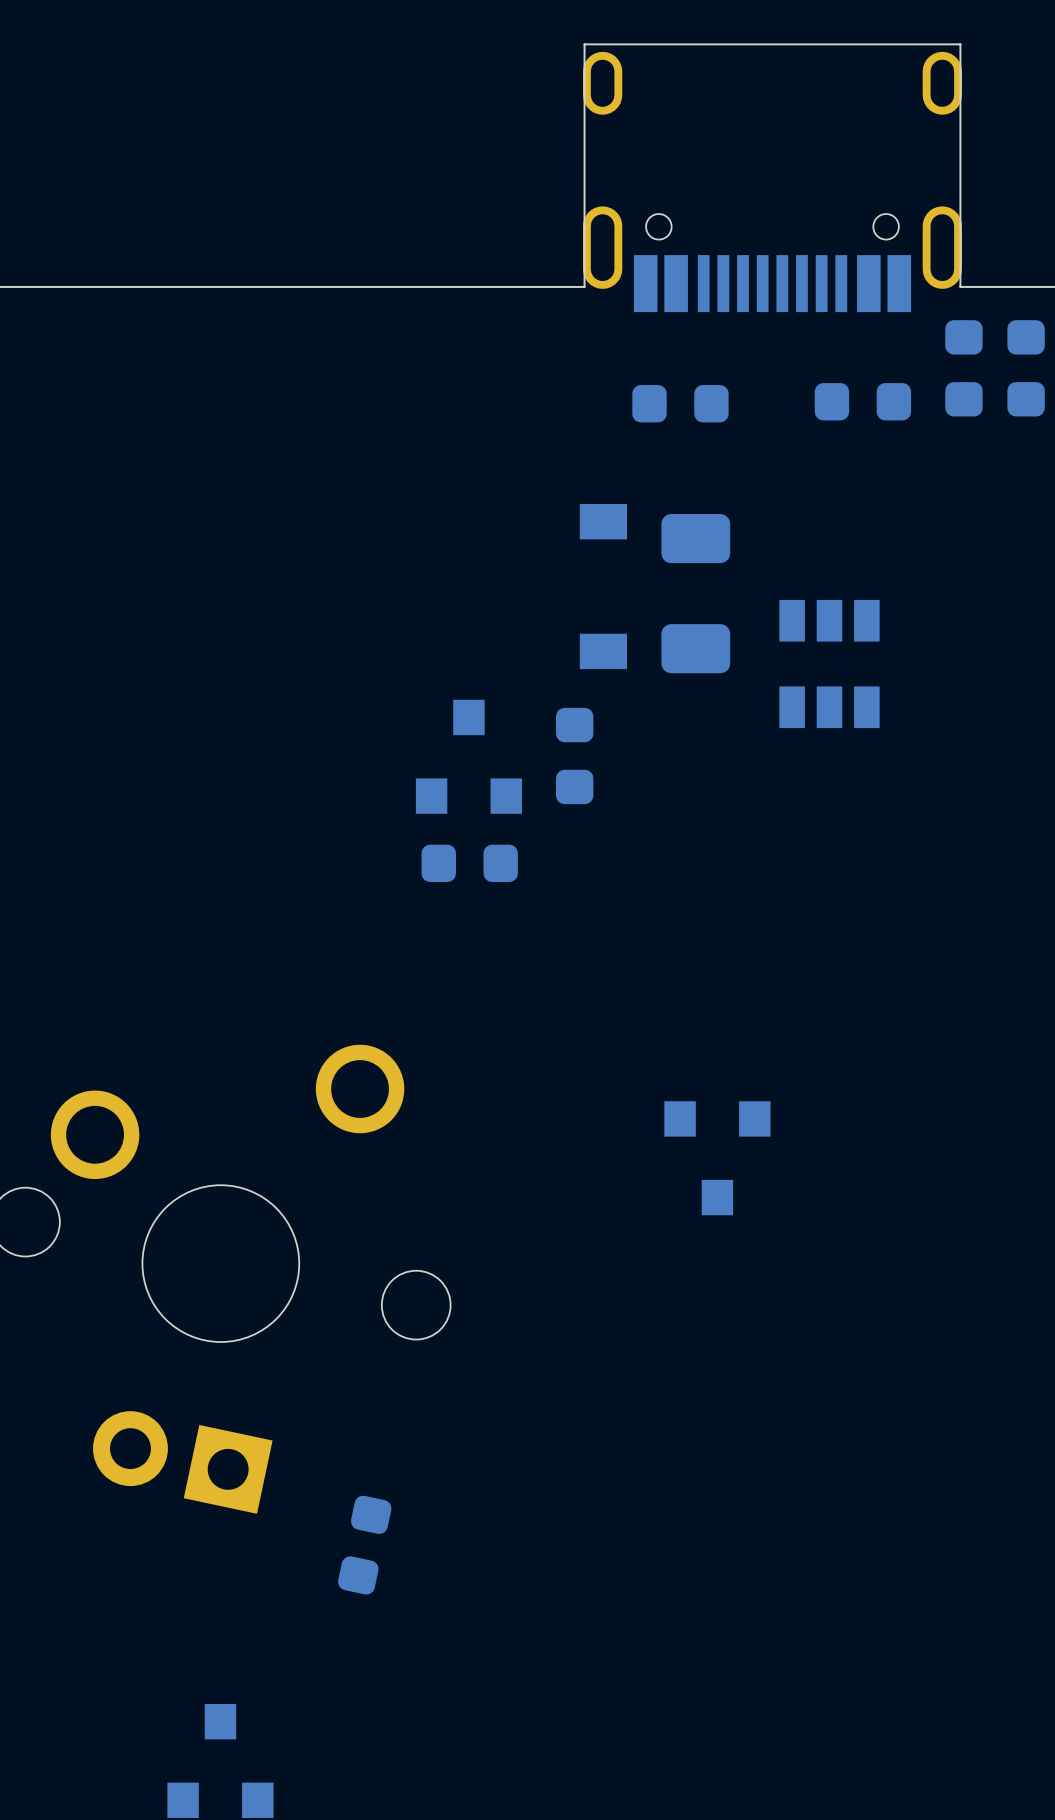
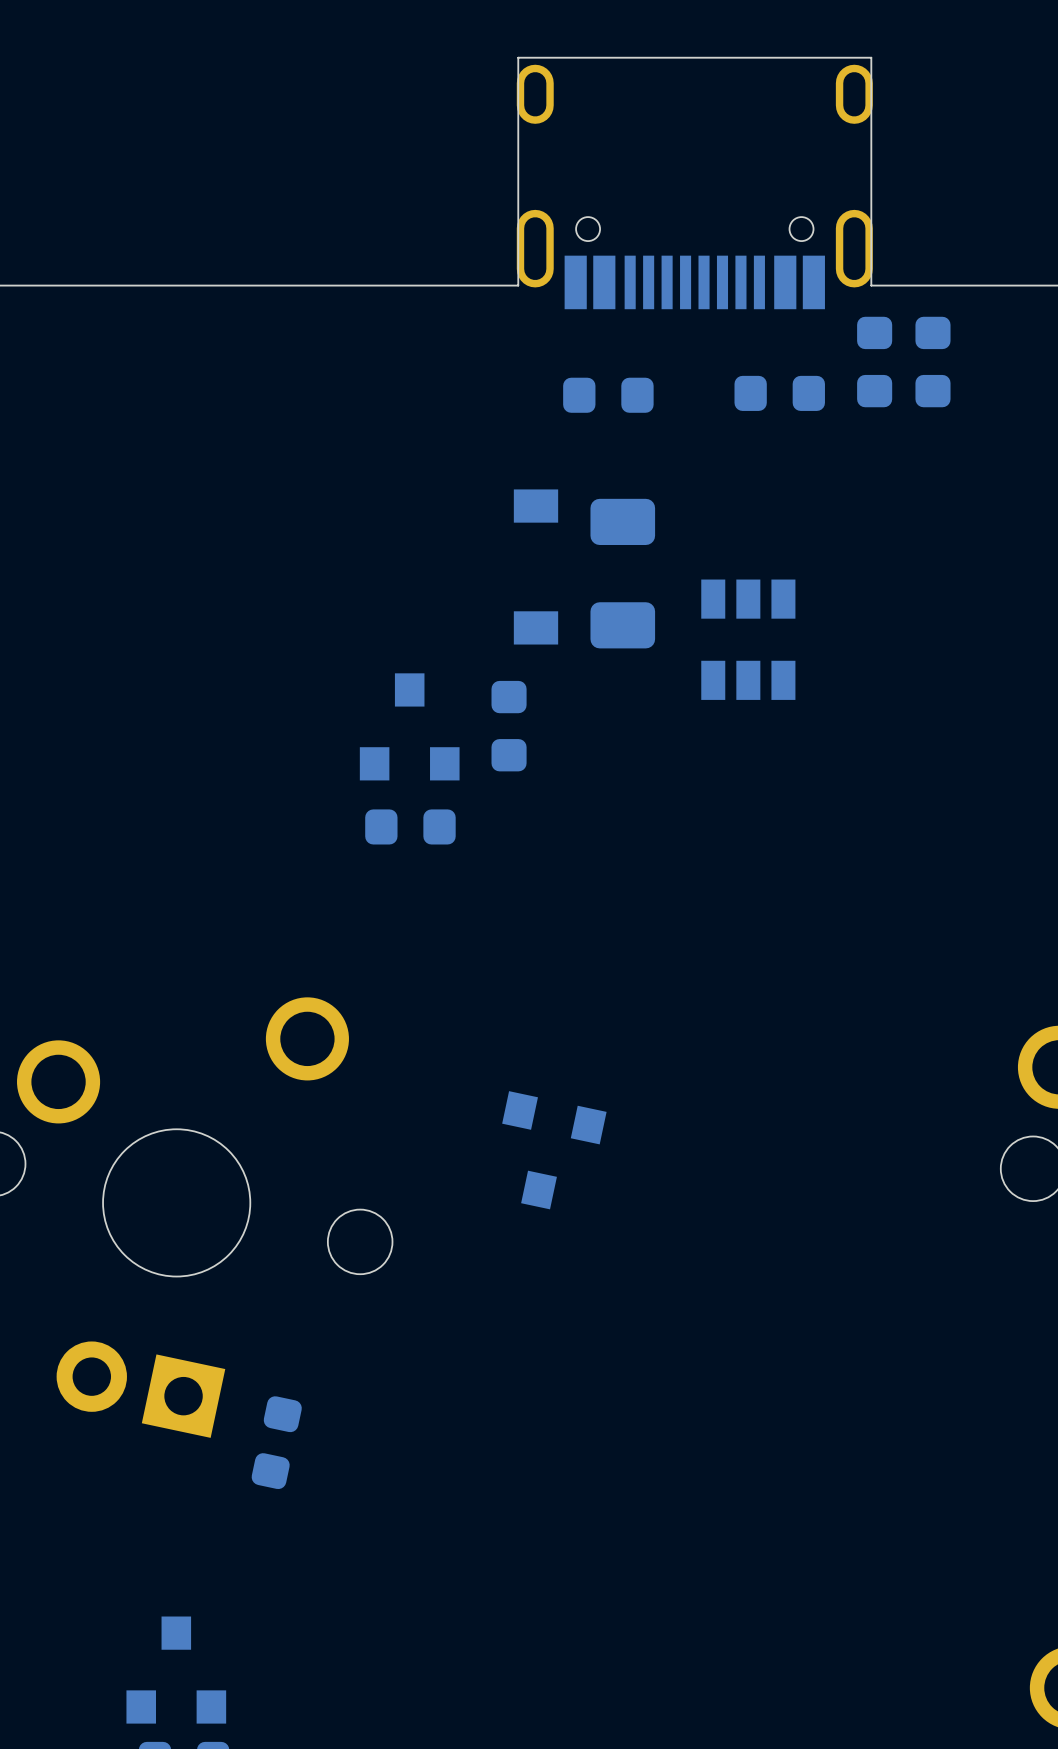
part: (717, 1158) -> none
part: none -> (554, 1150)
part position: (364, 1545) -> (276, 1442)

